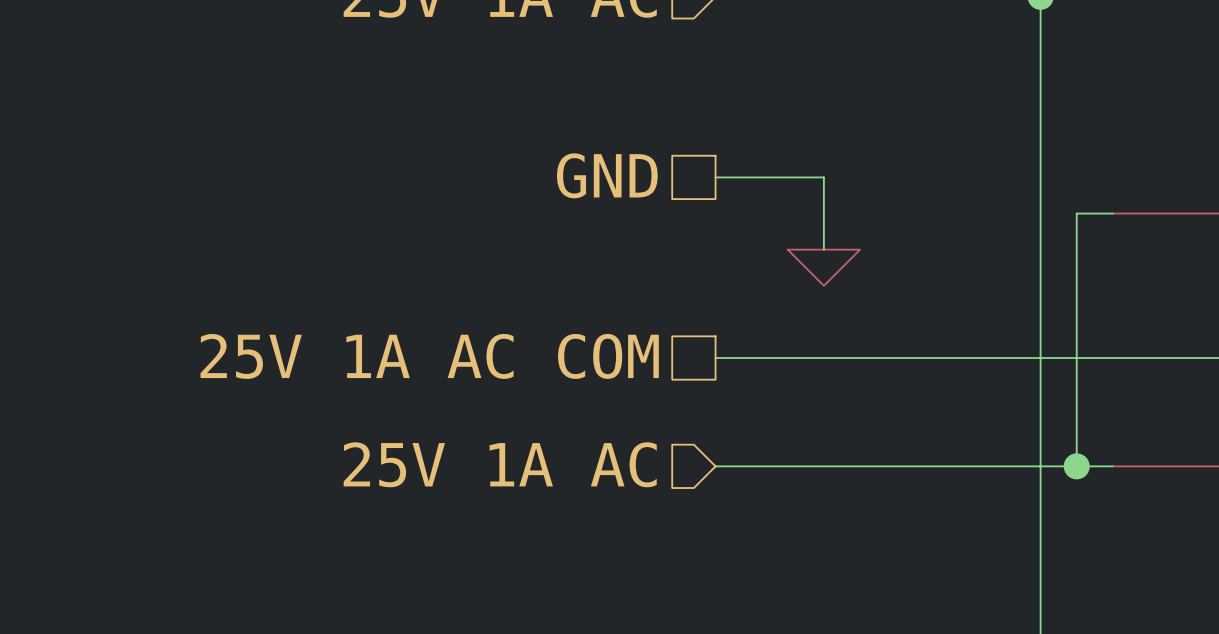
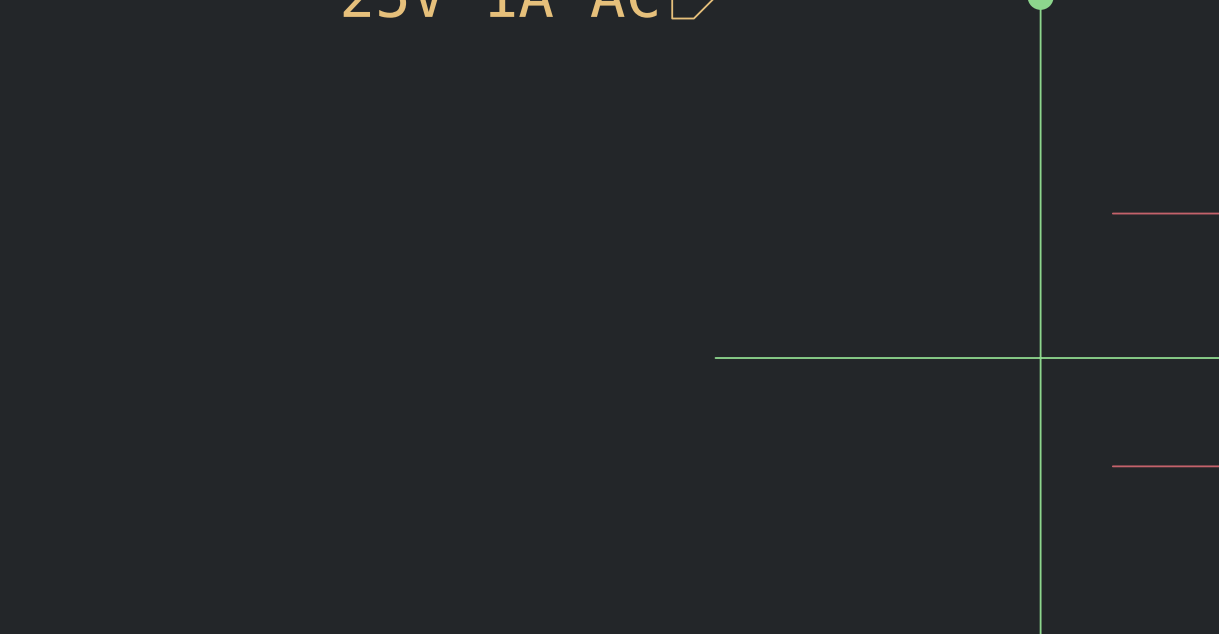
hierarchical label: GND (607, 175) -> none
wire: (715, 177) (823, 177) (823, 249) -> none
wire: (1112, 213) (1076, 213) (1076, 466) -> none
power symbol: (823, 267) -> none
hierarchical label: 25V 1A AC COM (429, 356) -> none
hierarchical label: 25V 1A AC (500, 464) -> none
wire: (715, 466) (1112, 466) -> none
junction: (1076, 466) -> none

